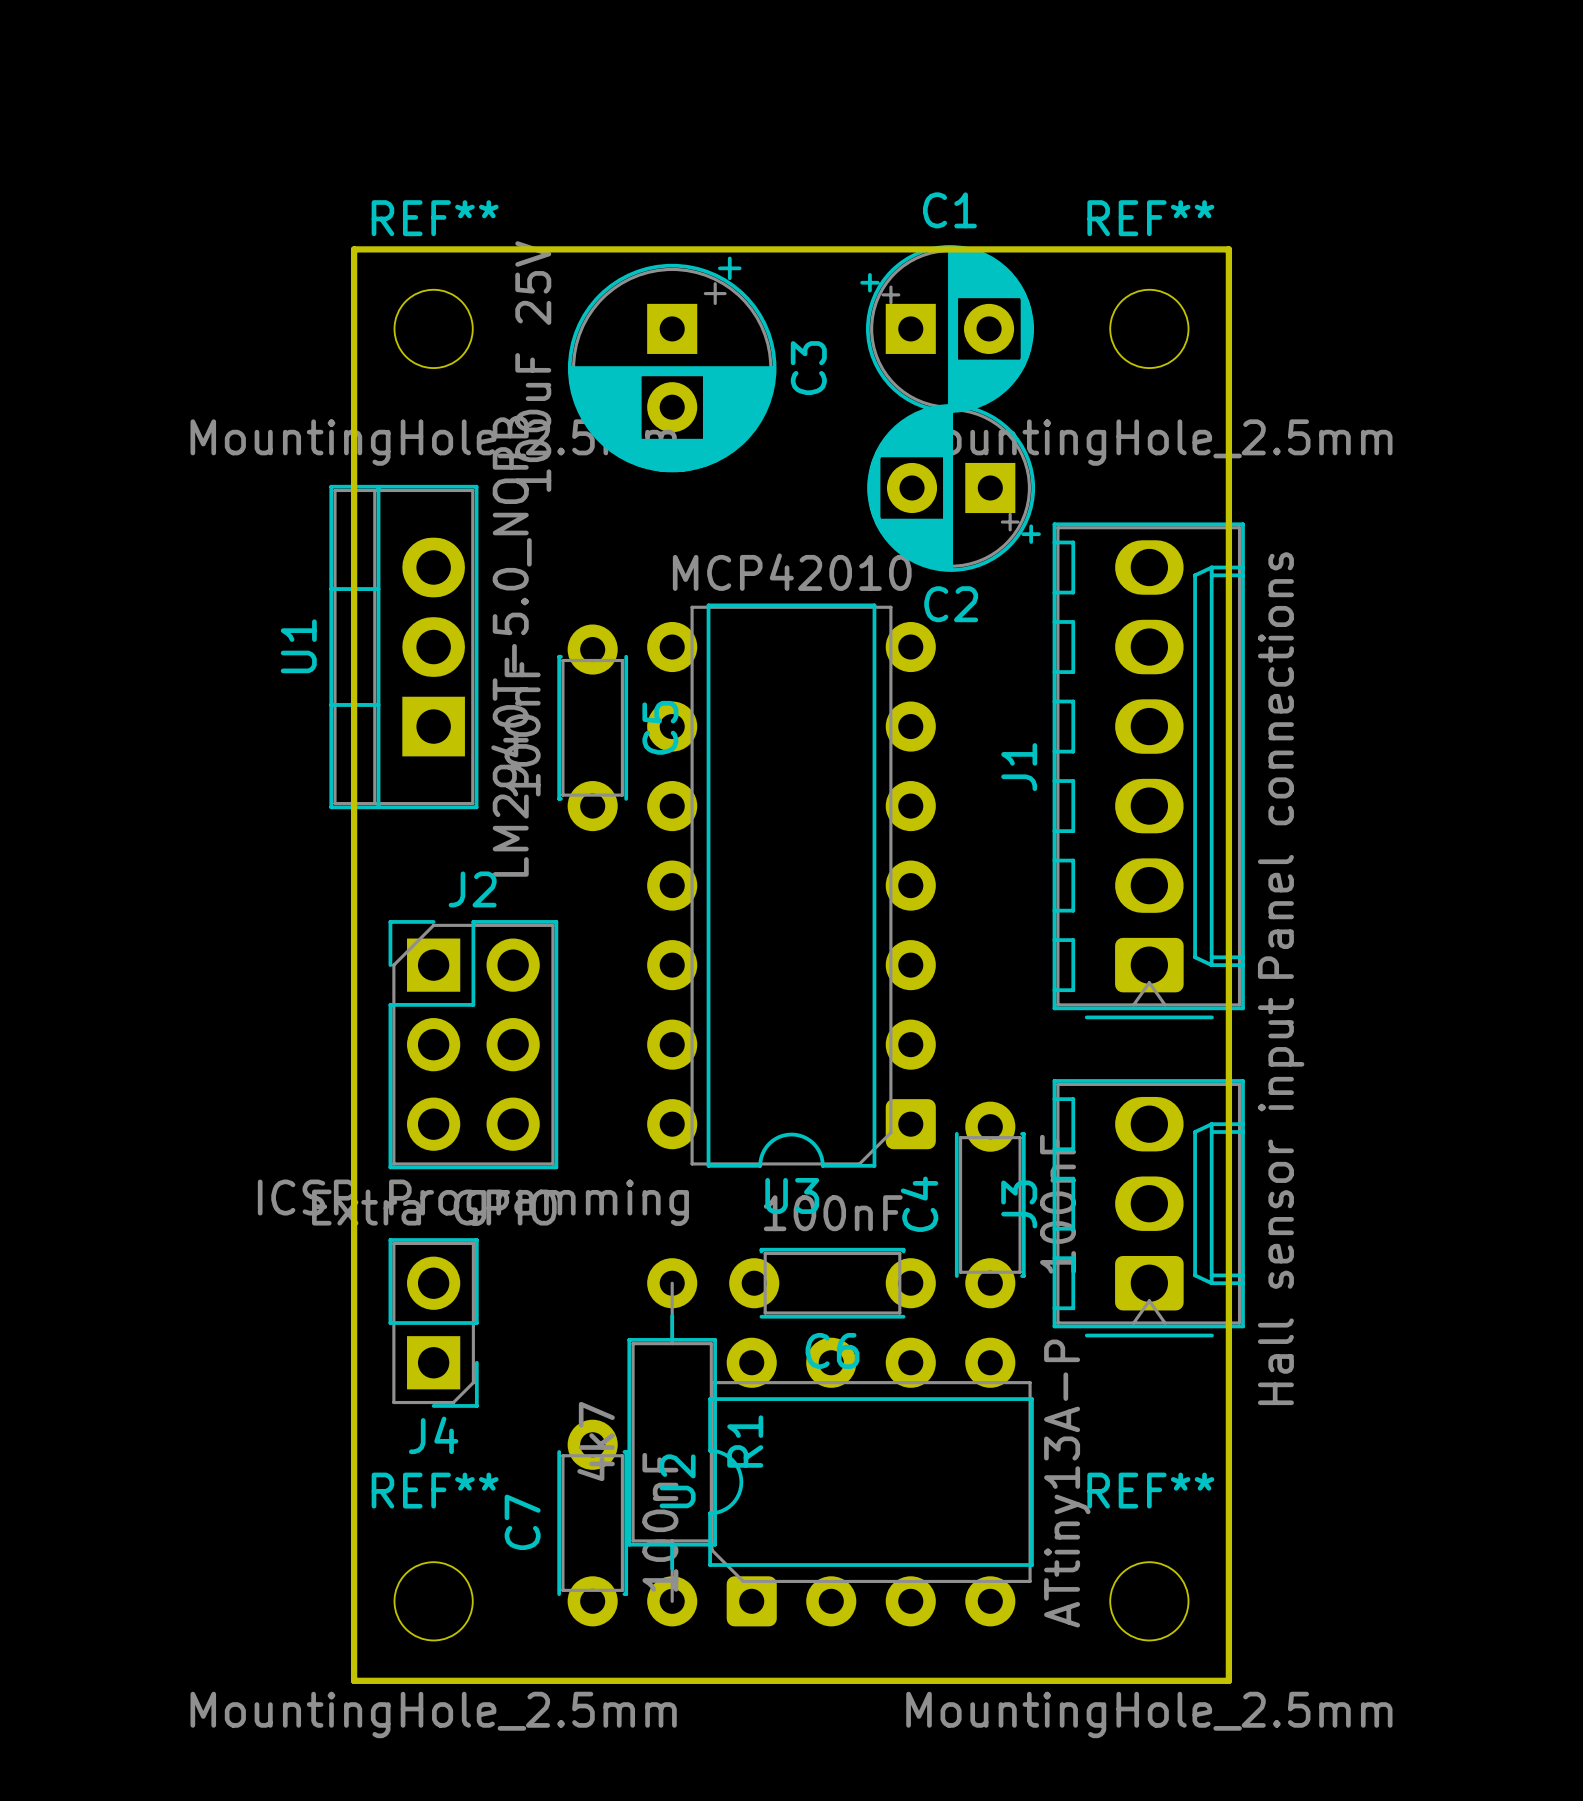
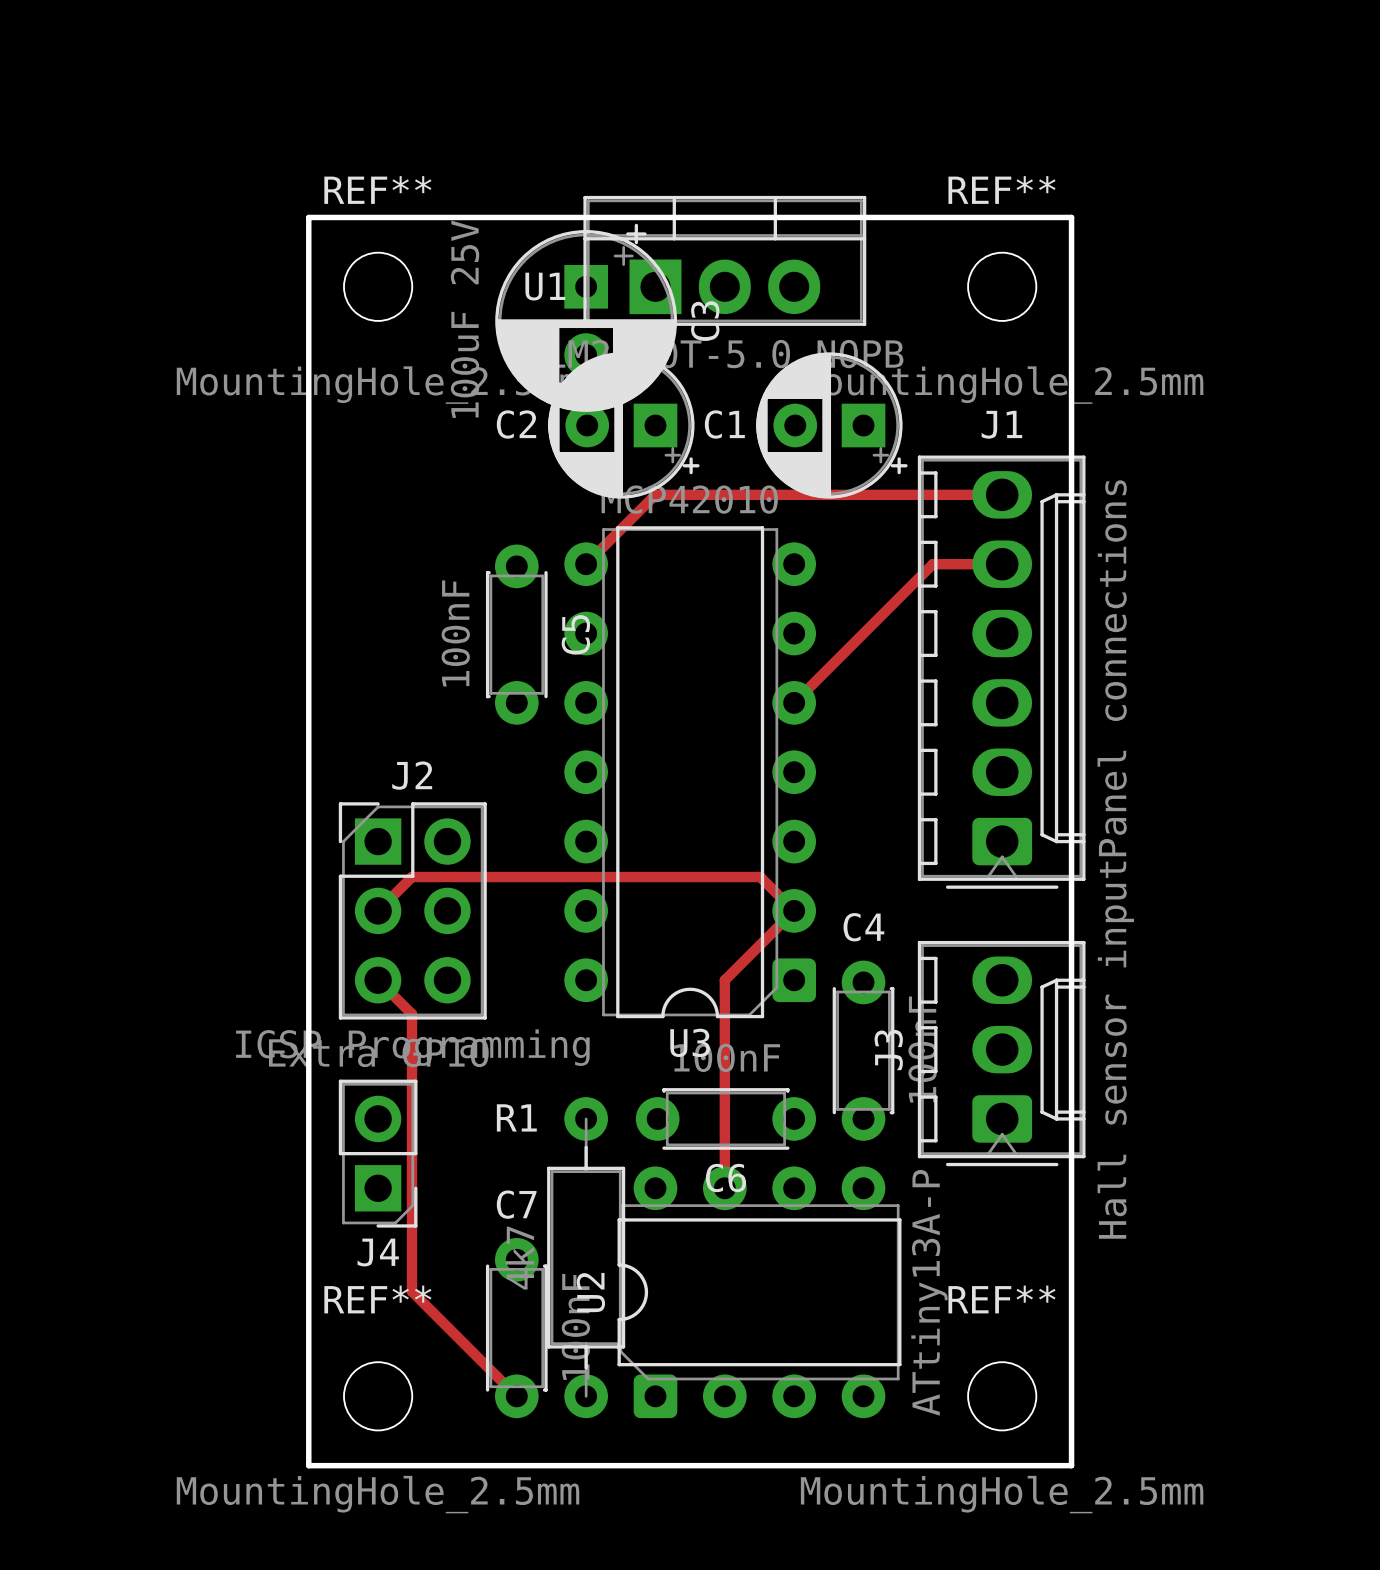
C1: (947, 328) -> none
C2: none -> (623, 425)
track: none -> (1002, 494) (655, 494) (586, 564)
C2 name: C2 (951, 604) -> C1 (724, 424)
U1 name position: U1 (298, 646) -> U1 (545, 286)
U1 rotation: 0° (403, 647) -> 90° clockwise (724, 260)
U1 position: (403, 647) -> (724, 260)
track: none -> (1002, 564) (932, 564) (794, 702)
J1 name rotation: 0° (1019, 767) -> 90° clockwise (1001, 424)
J1 name position: J1 (1019, 767) -> J1 (1001, 424)
track: none -> (378, 910) (412, 877) (760, 877) (794, 910) (724, 980) (724, 1188)
track: none -> (378, 980) (412, 1014) (412, 1291) (516, 1396)
C4 name rotation: 0° (919, 1204) -> 90° clockwise (863, 927)
C4 name position: C4 (919, 1204) -> C4 (863, 927)
R1 name rotation: 0° (745, 1441) -> 90° clockwise (516, 1117)
R1 name position: R1 (745, 1441) -> R1 (516, 1117)
C7 name rotation: 0° (522, 1522) -> 90° clockwise (516, 1204)
C7 name position: C7 (522, 1522) -> C7 (516, 1204)

